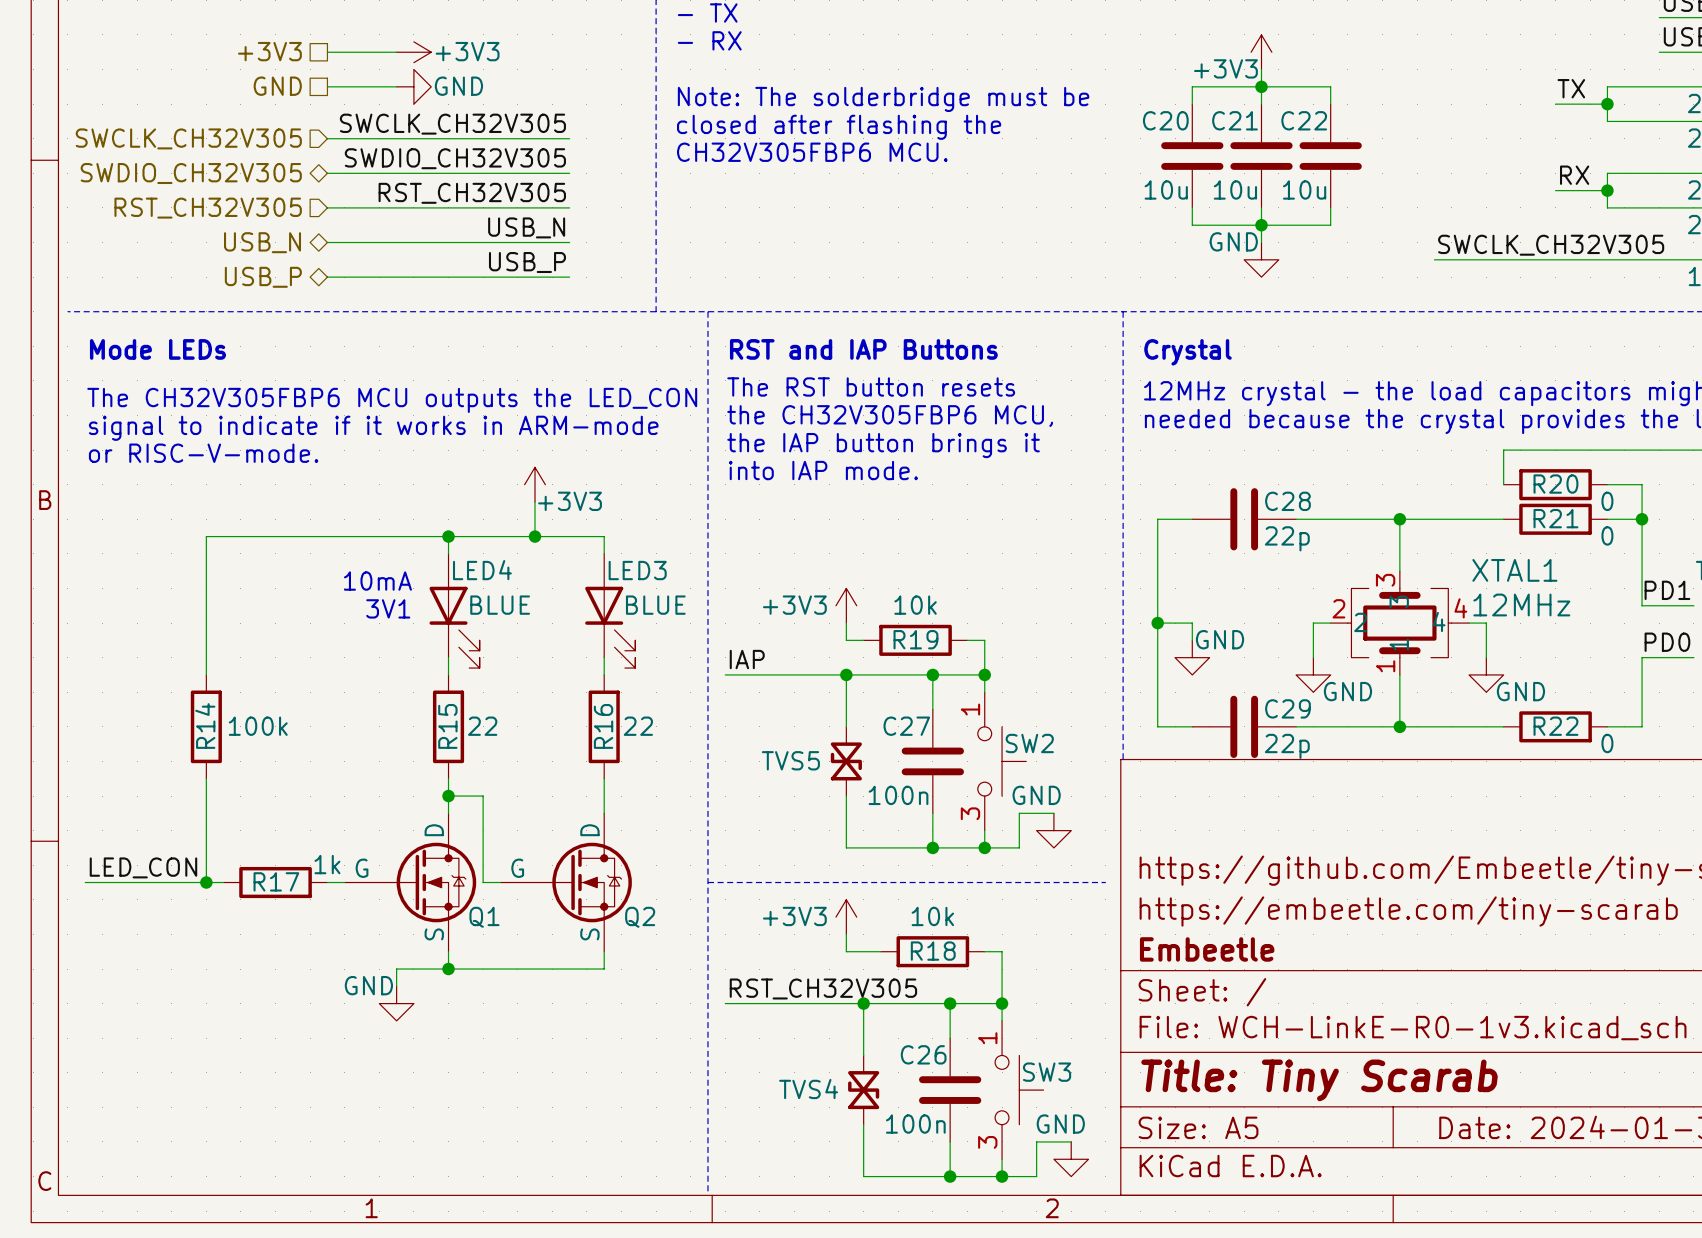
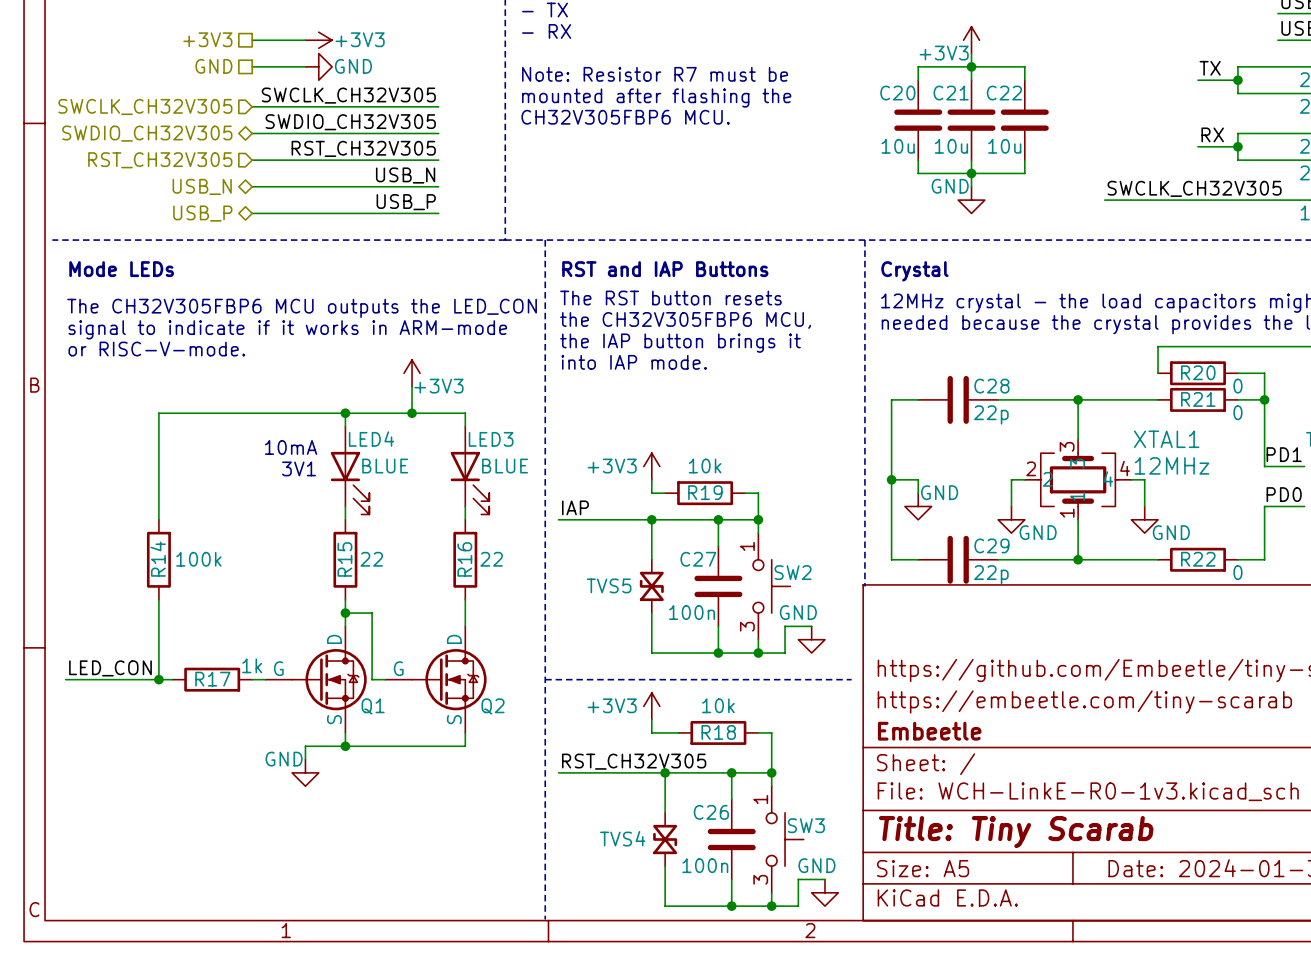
text: Note: The solderbridge must be (883, 99) -> Note: Resistor R7 must be (655, 74)
text: closed after flashing the (839, 127) -> mounted after flashing the (656, 98)

